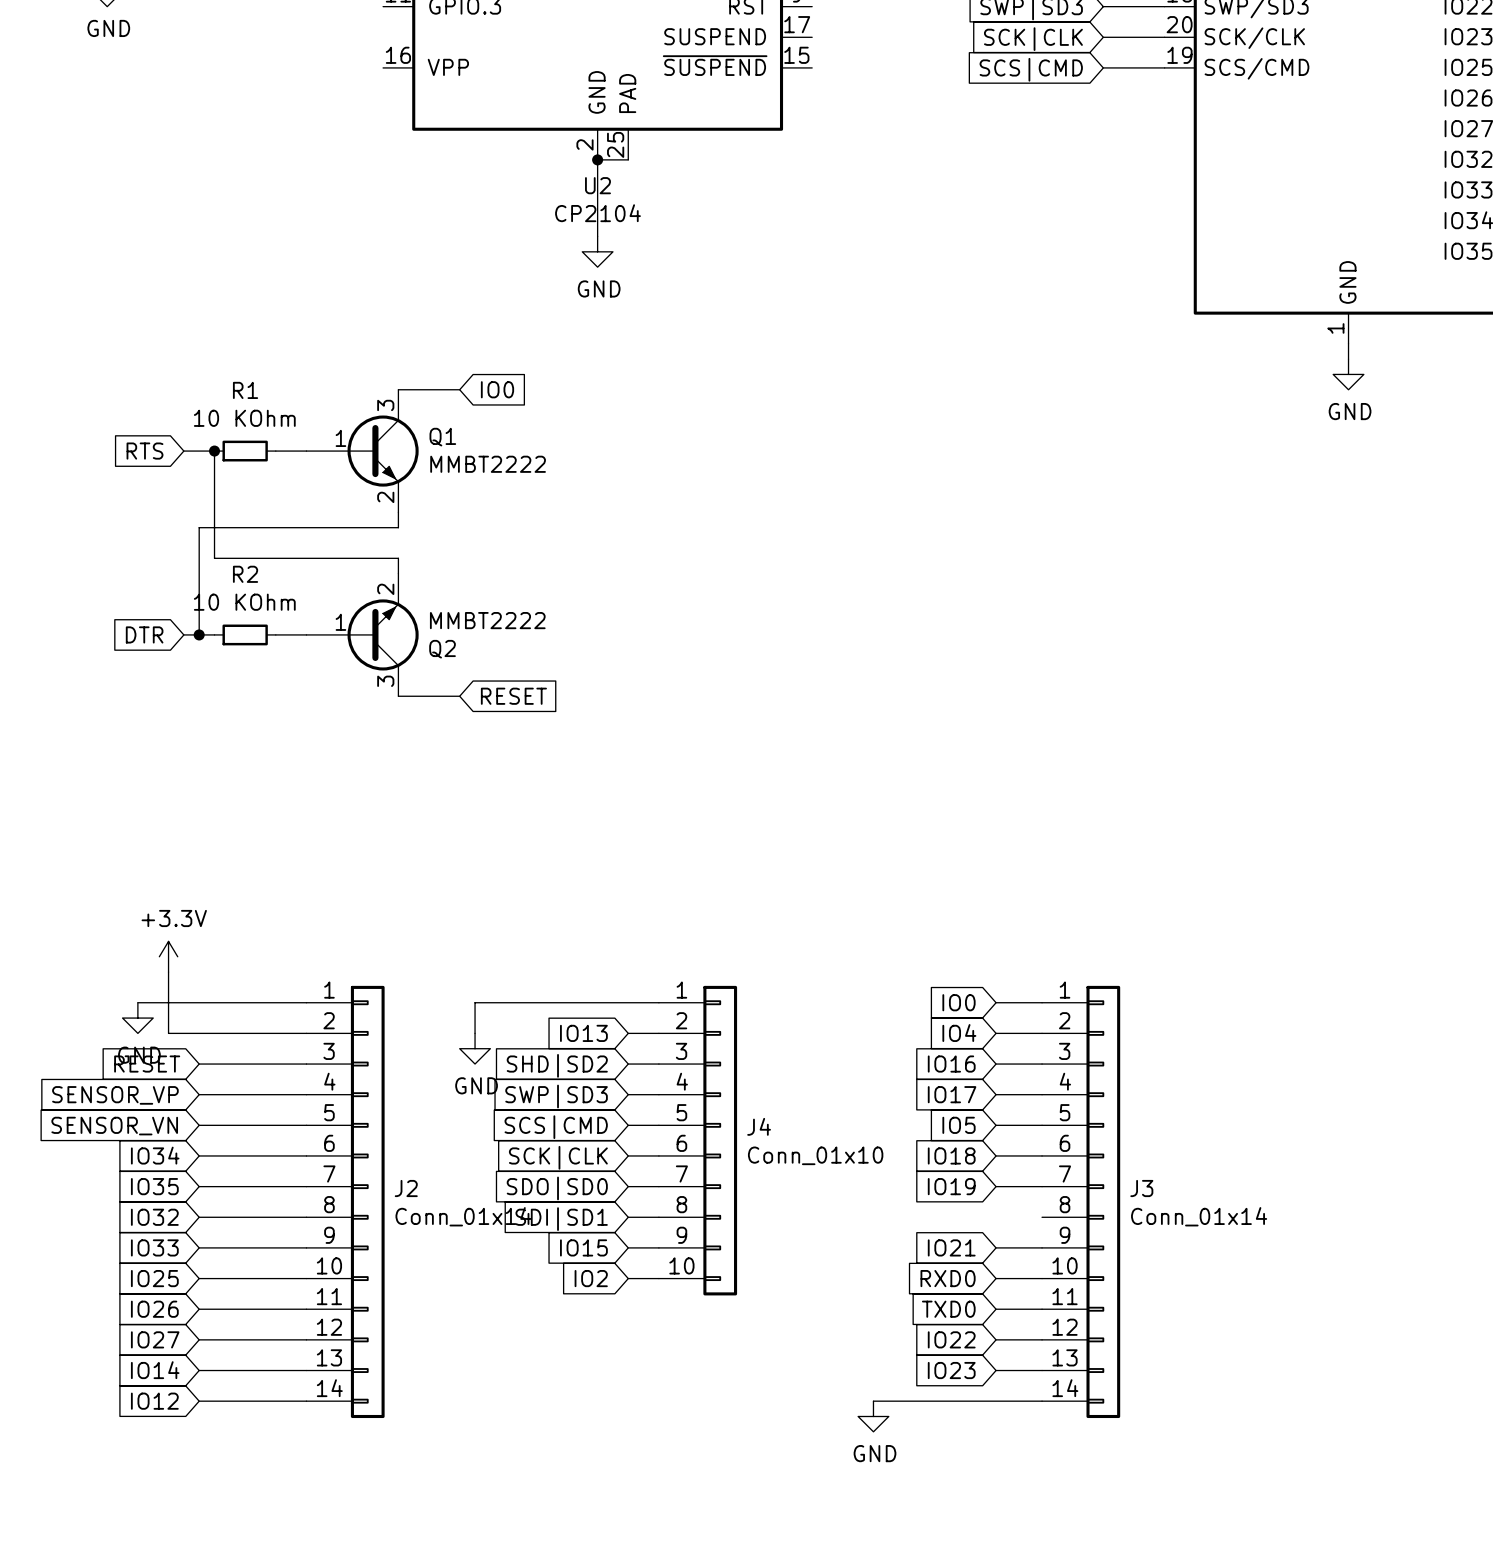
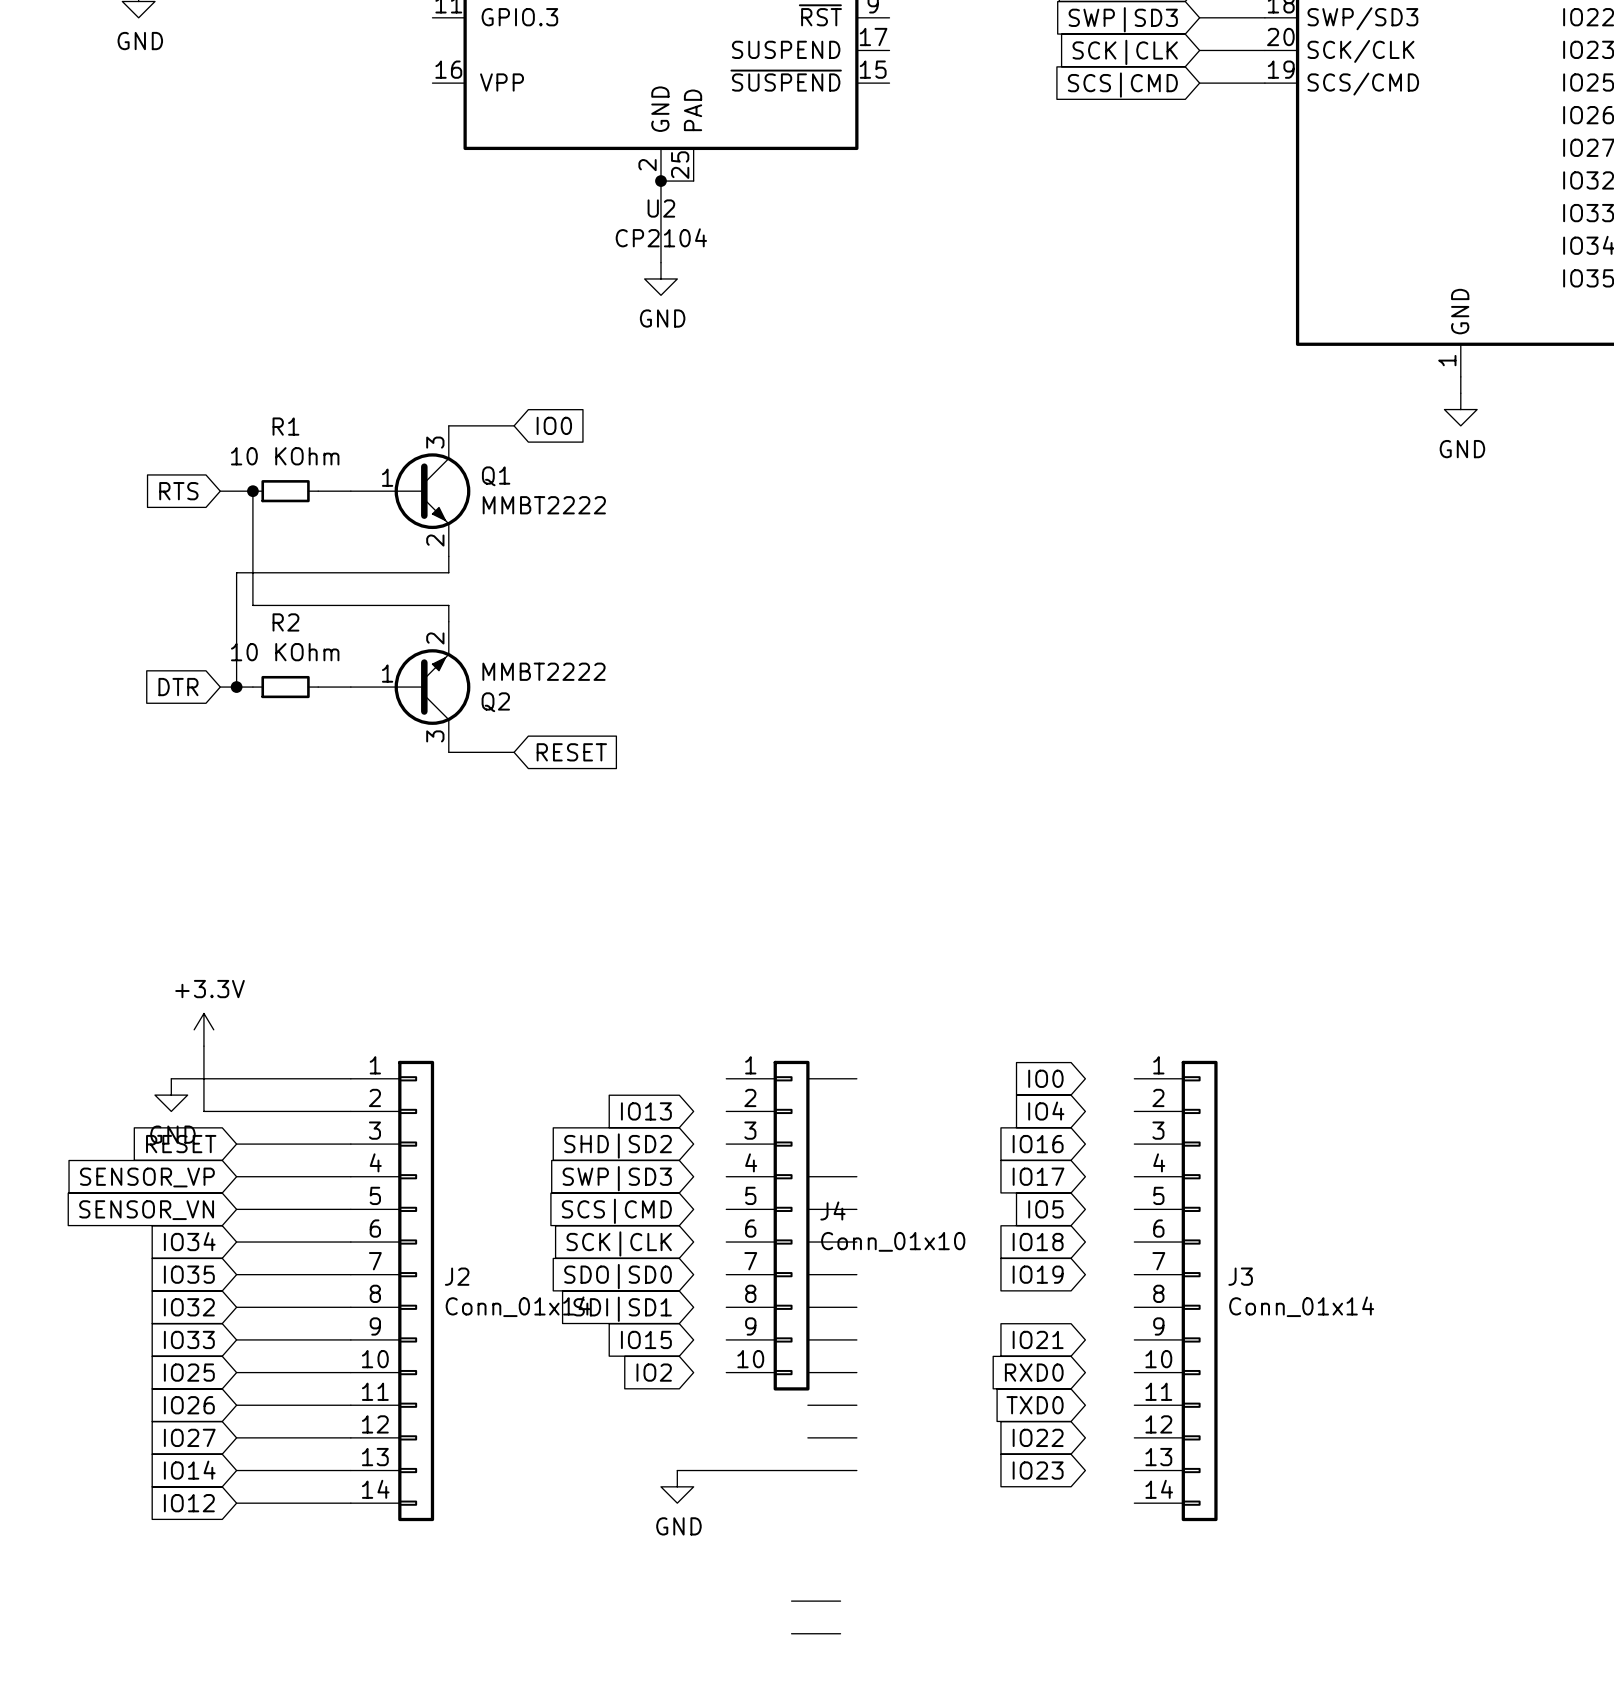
wire: (658, 1002) (475, 1002) (475, 1033) -> none
wire: (996, 1002) (1042, 1002) -> none
wire: (628, 1033) (658, 1033) -> none
wire: (996, 1033) (1042, 1033) -> (807, 1078) (856, 1078)
power symbol: GND (475, 1048) -> none
wire: (628, 1064) (658, 1064) -> none
wire: (996, 1064) (1042, 1064) -> none
wire: (628, 1094) (658, 1094) -> none
wire: (996, 1094) (1042, 1094) -> (807, 1274) (856, 1274)
wire: (628, 1125) (658, 1125) -> none
wire: (996, 1125) (1042, 1125) -> (807, 1176) (856, 1176)
wire: (628, 1155) (658, 1155) -> none
wire: (996, 1155) (1042, 1155) -> (807, 1209) (856, 1209)
wire: (628, 1186) (658, 1186) -> none
wire: (996, 1186) (1042, 1186) -> (807, 1242) (856, 1242)
wire: (628, 1217) (658, 1217) -> none
wire: (628, 1247) (658, 1247) -> none
wire: (996, 1247) (1042, 1247) -> (807, 1307) (856, 1307)
wire: (628, 1278) (658, 1278) -> none
wire: (996, 1278) (1042, 1278) -> (807, 1339) (856, 1339)
wire: (996, 1309) (1042, 1309) -> (807, 1372) (856, 1372)
wire: (996, 1339) (1042, 1339) -> (807, 1405) (856, 1405)
wire: (996, 1370) (1042, 1370) -> (807, 1437) (856, 1437)
power symbol: none -> GND (677, 1486)
wire: (873, 1401) (1042, 1401) -> (677, 1470) (856, 1470)
power symbol: GND (873, 1416) -> none
wire: none -> (791, 1601) (840, 1601)
wire: none -> (791, 1633) (840, 1633)

